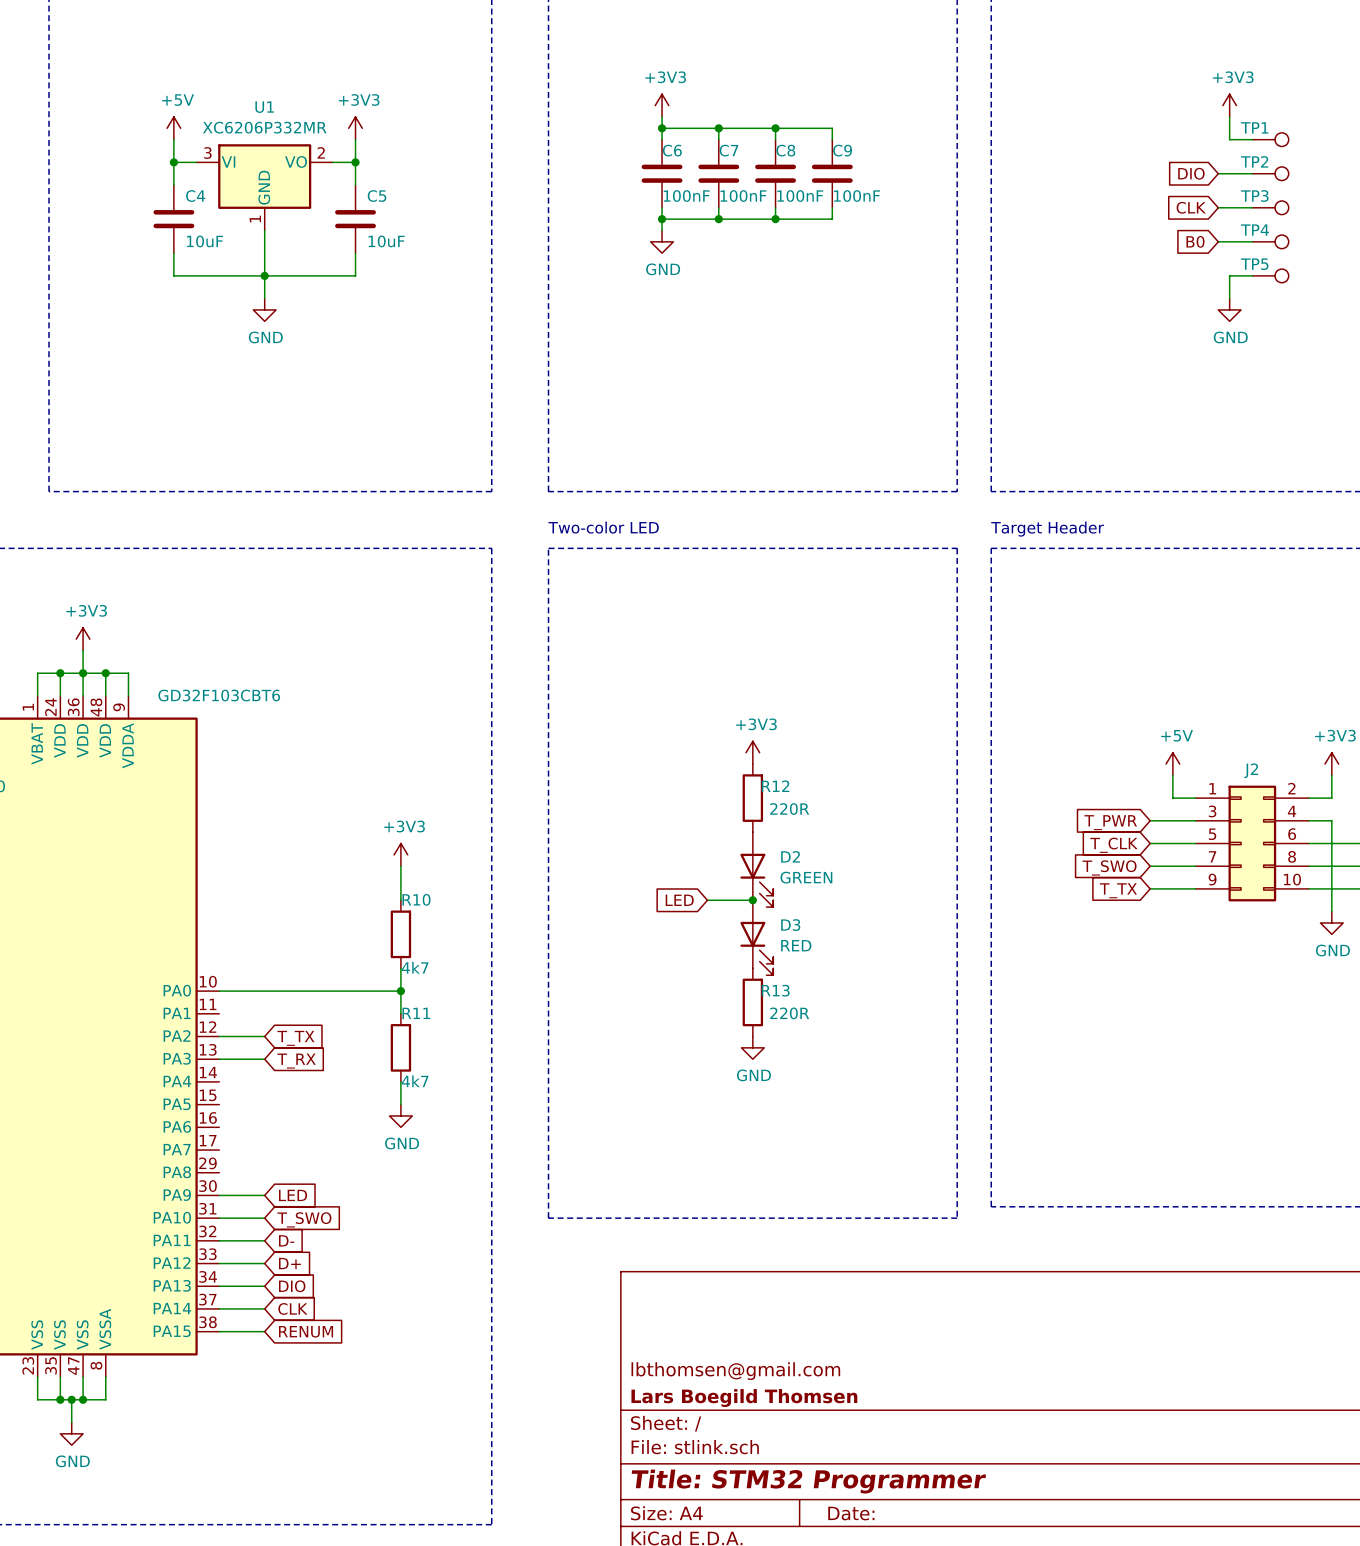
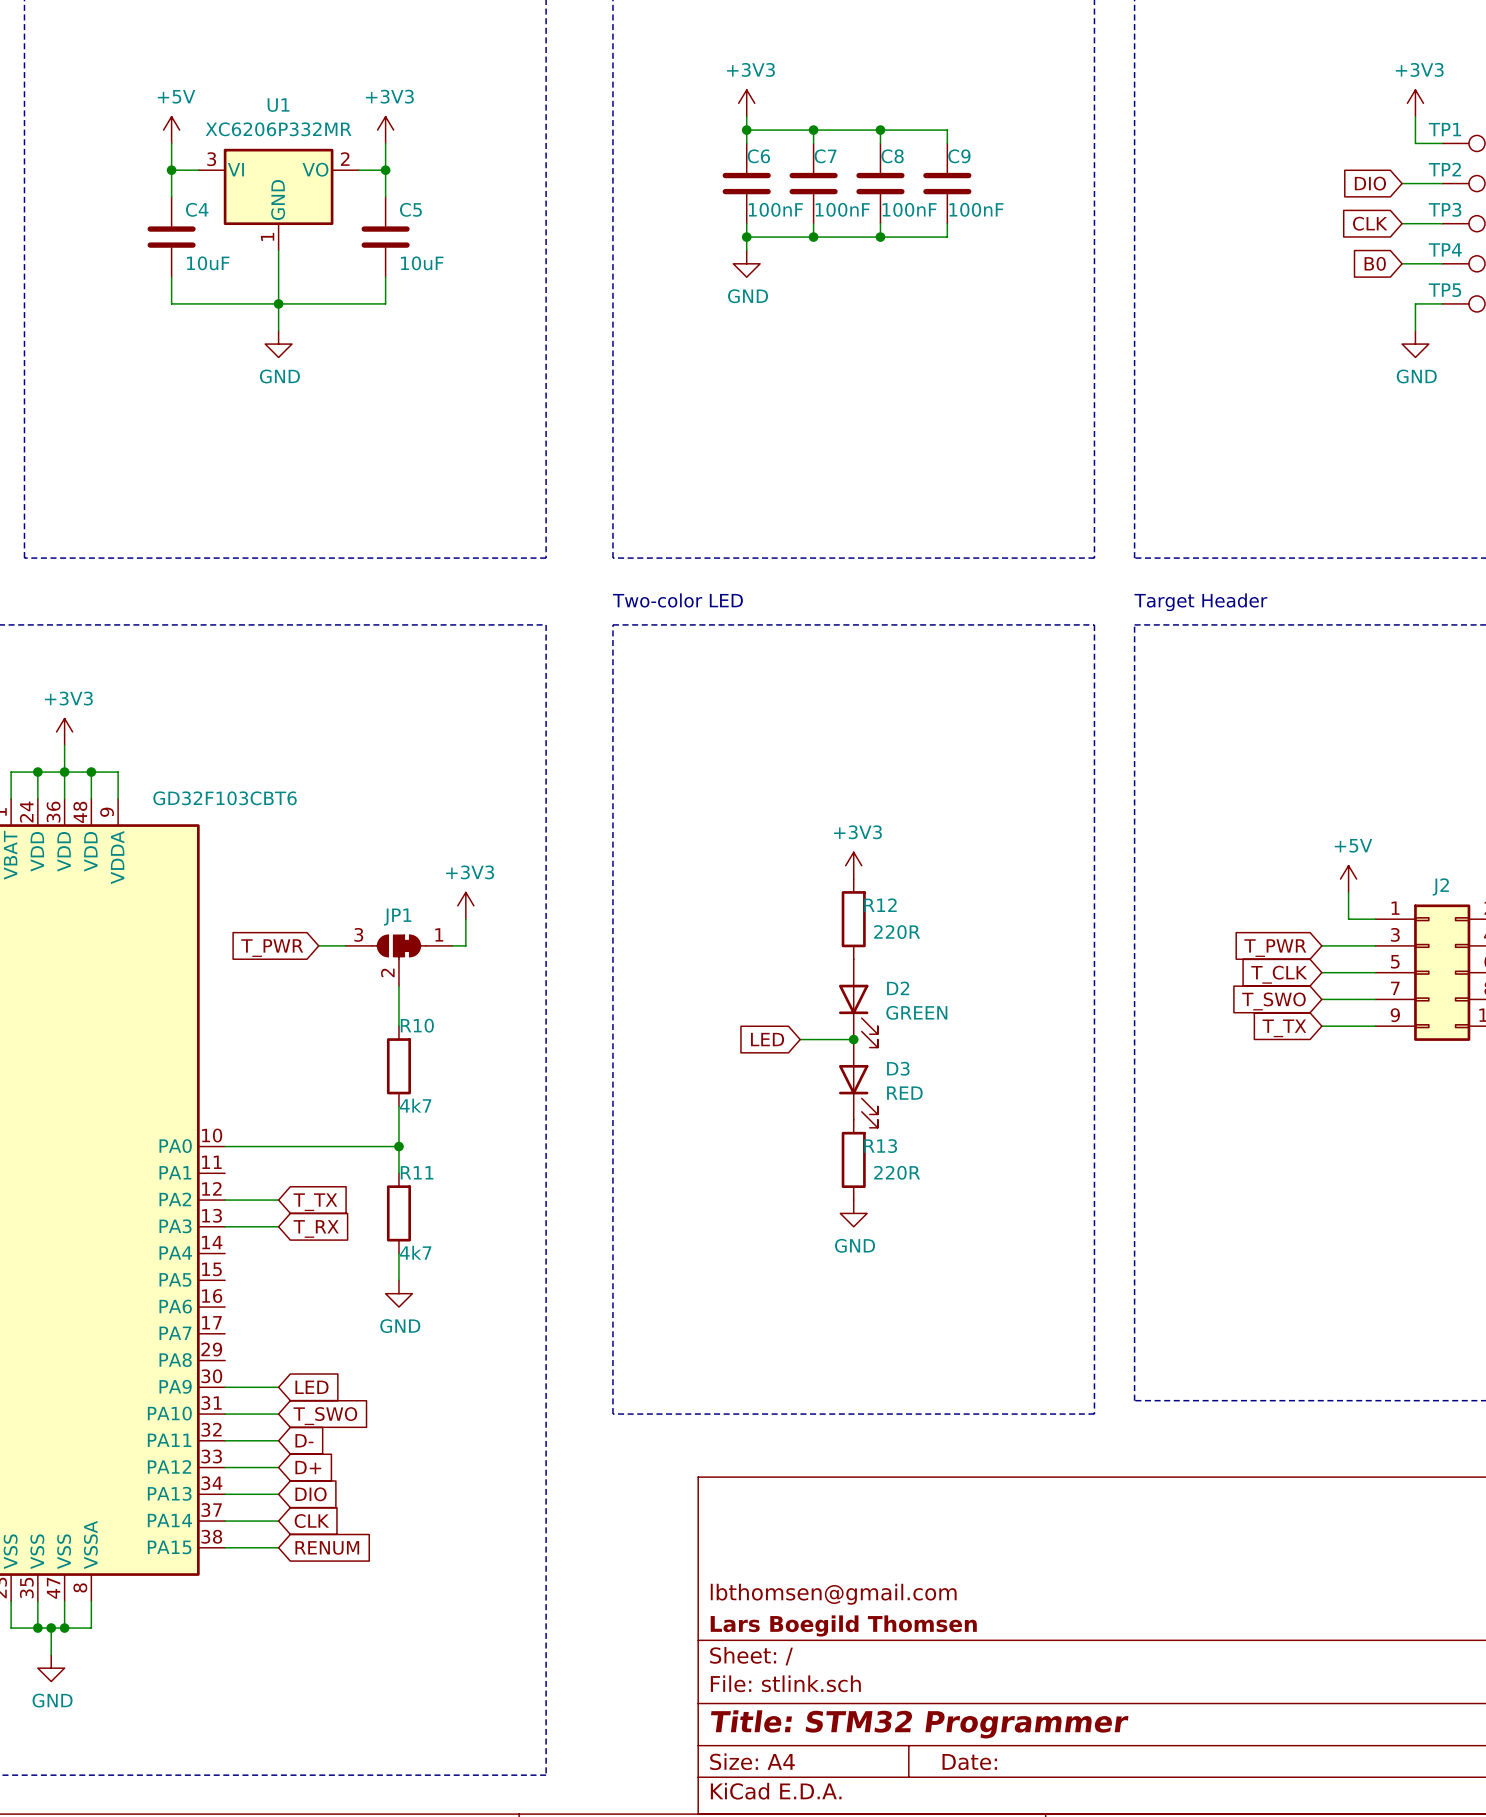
wire: none -> (465, 919) (465, 945) (452, 945)
wire: none -> (318, 945) (345, 945)
global label: none -> T_PWR (272, 948)
JP1: none -> (398, 960)
power symbol position: +3V3 (400, 854) -> +3V3 (465, 905)
wire: (400, 866) (400, 900) -> (398, 986) (398, 1026)
R10 position: (400, 934) -> (398, 1066)
wire: none -> (398, 1106) (398, 1173)
wire: (400, 968) (400, 1013) -> none
wire: (366, 991) (400, 991) -> none
junction position: (400, 991) -> (398, 1146)
R11 position: (400, 1047) -> (398, 1213)
wire: (400, 1081) (400, 1104) -> (398, 1253) (398, 1280)
power symbol position: GND (400, 1115) -> GND (398, 1293)

